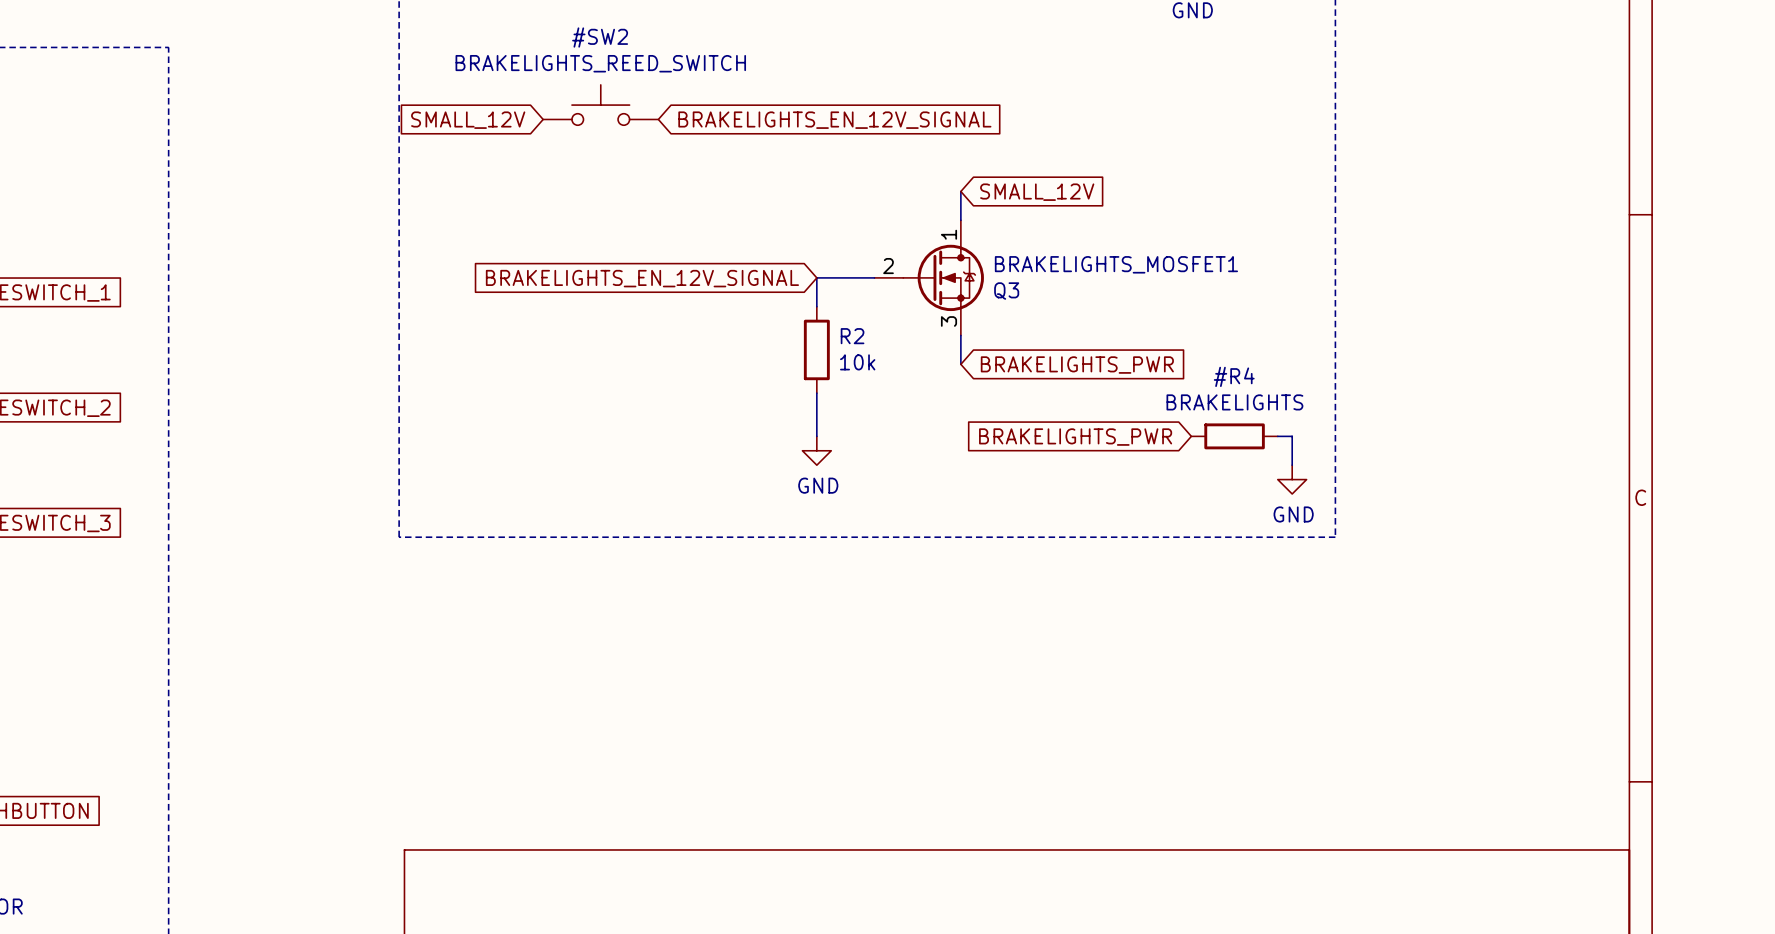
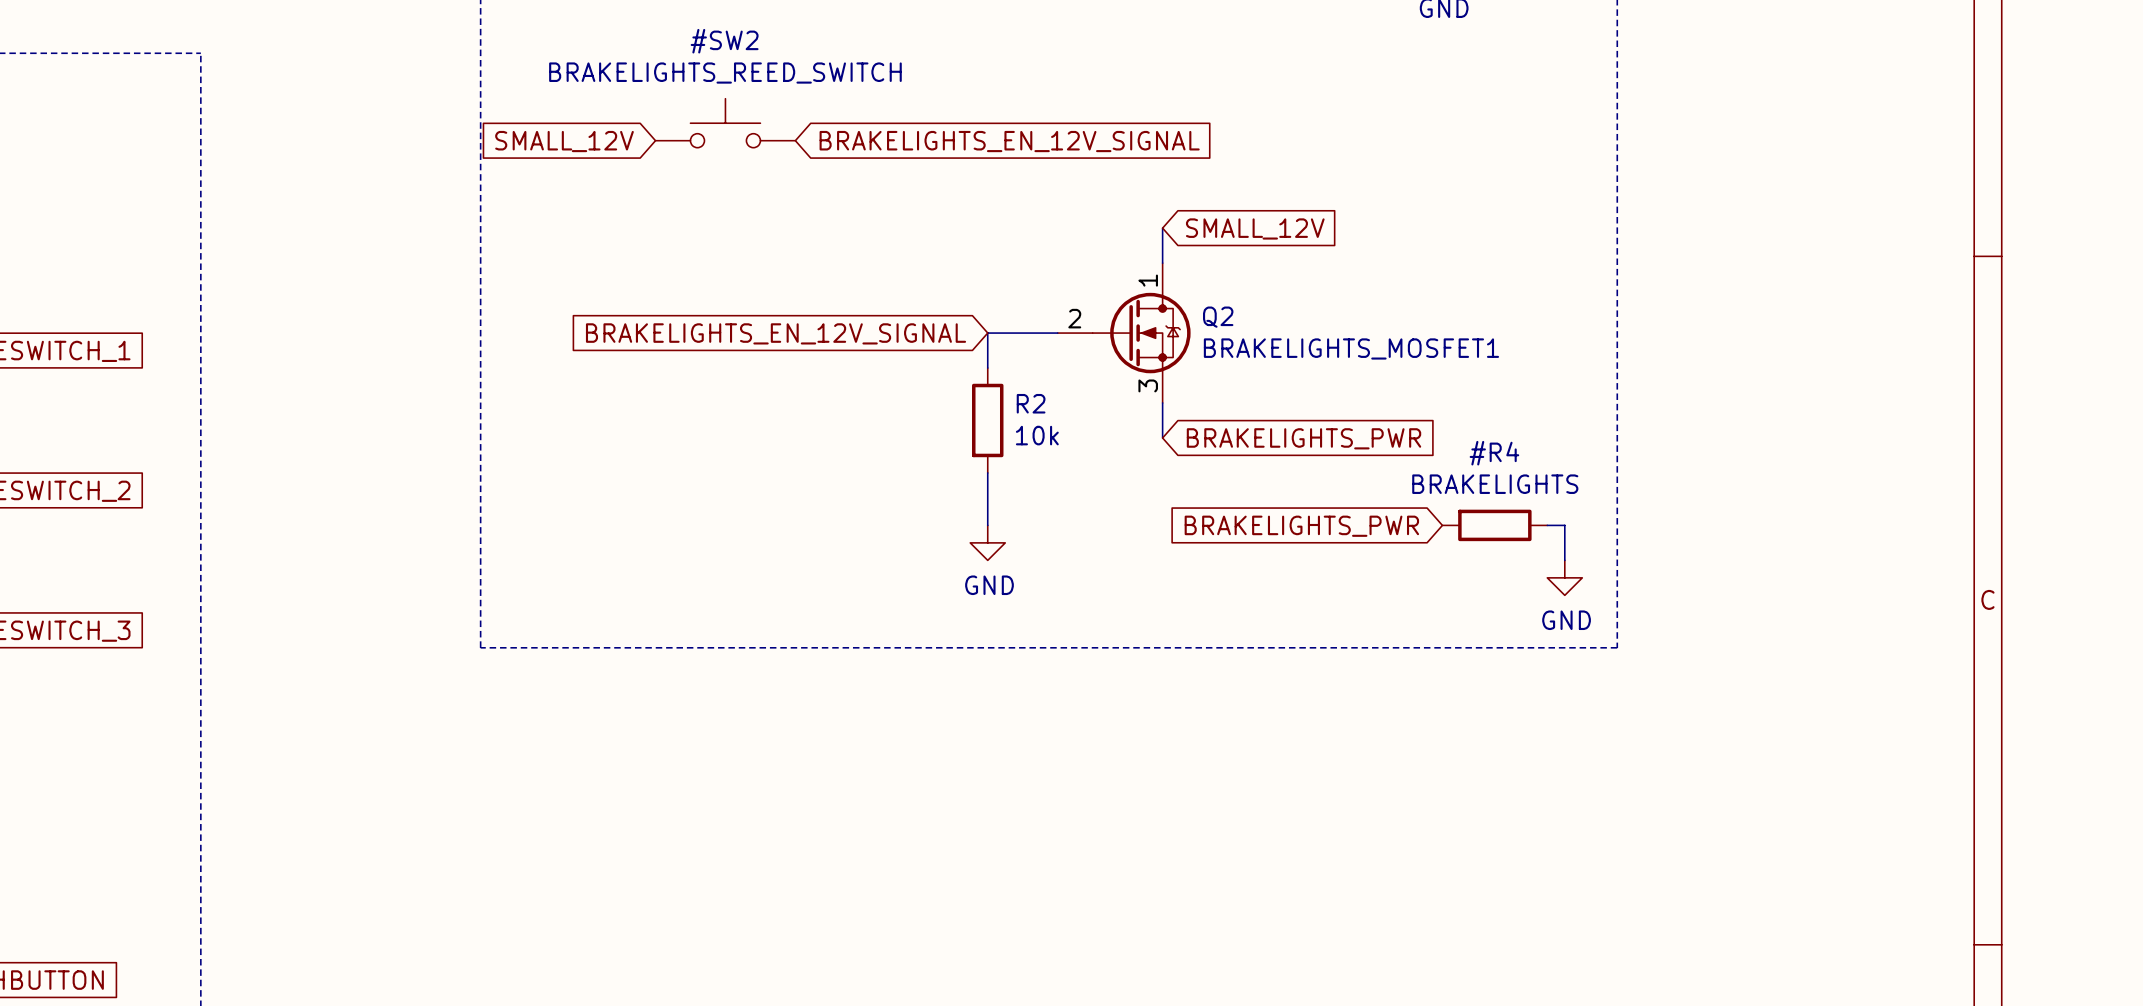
BRAKELIGHTS_MOSFET1 name: BRAKELIGHTS_MOSFET1 (1116, 264) -> Q2 (1218, 317)
BRAKELIGHTS_MOSFET1 value: Q3 (1006, 291) -> BRAKELIGHTS_MOSFET1 (1351, 348)

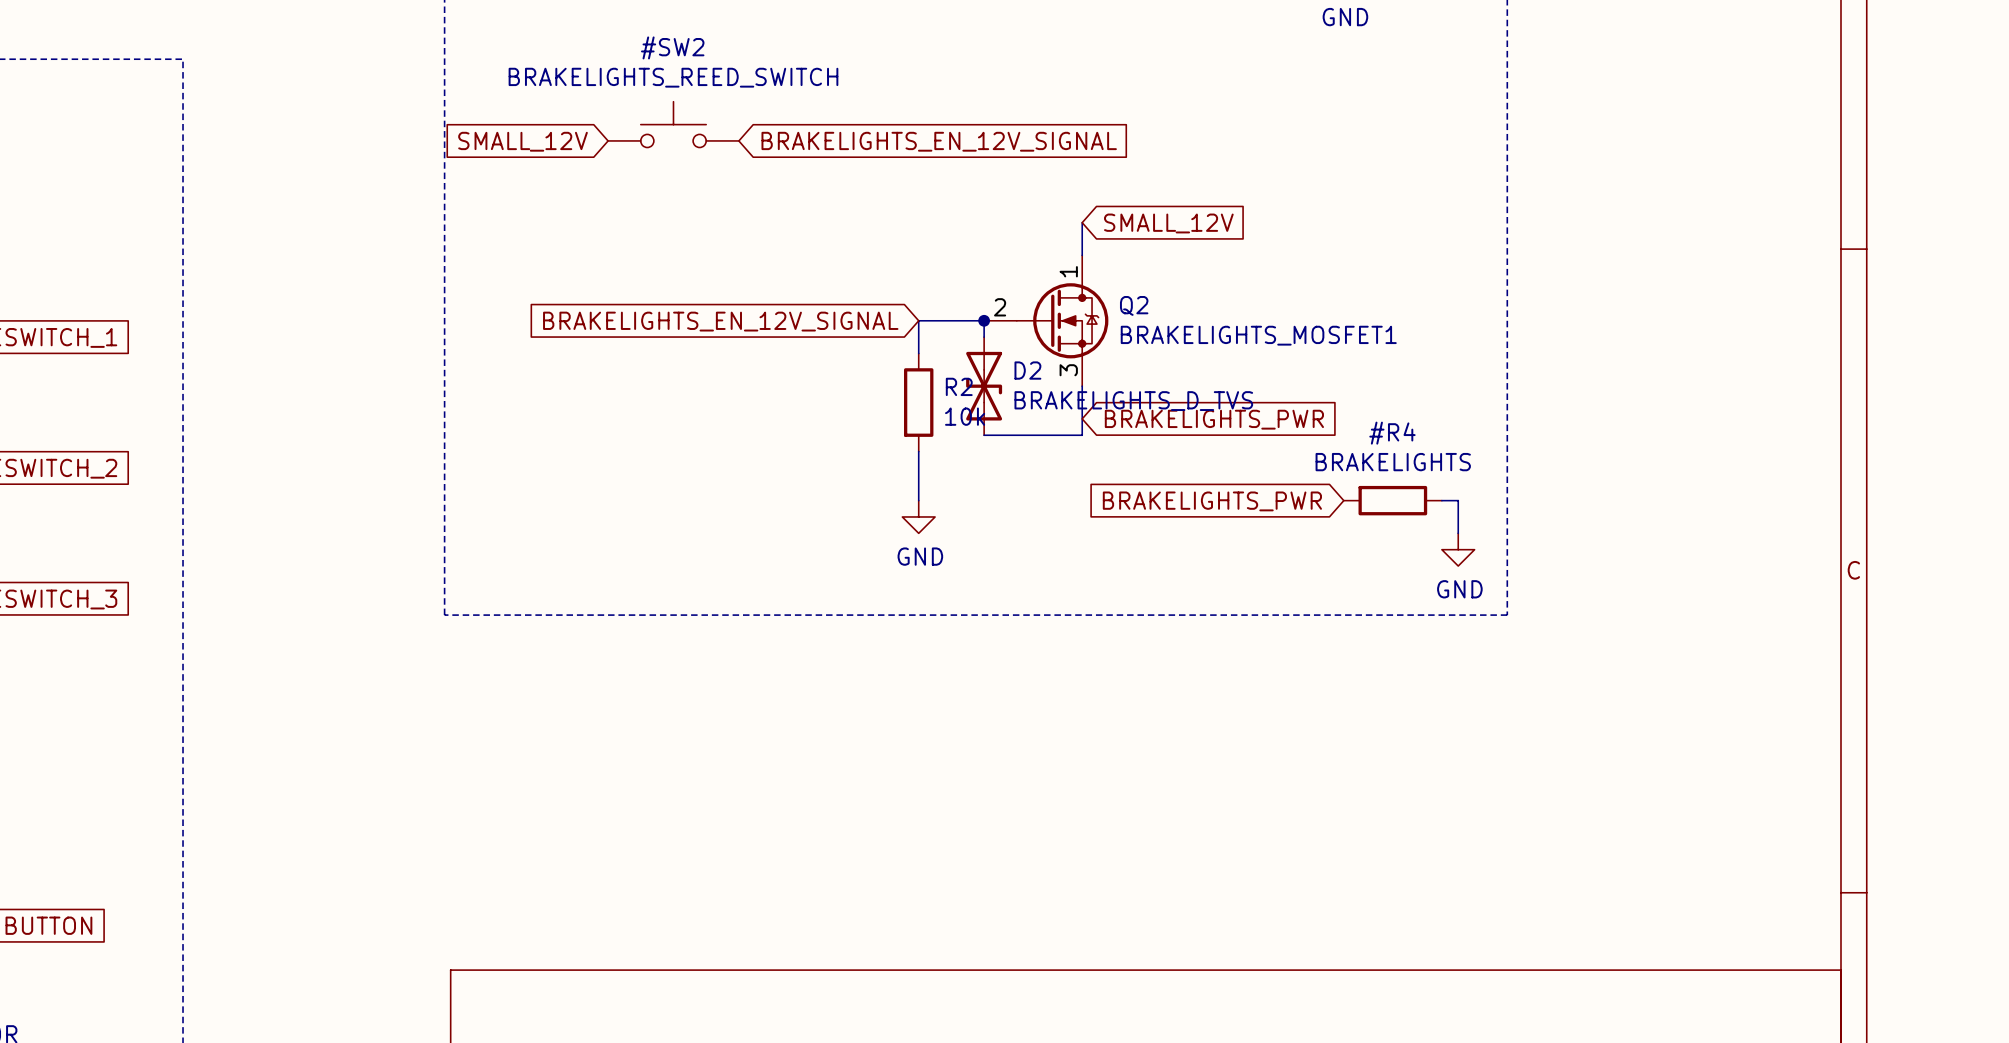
wire: none -> (984, 320) (984, 337)
junction: none -> (984, 320)
D2: none -> BRAKELIGHTS_D_TVS (984, 386)
wire: none -> (1082, 418) (1082, 435) (984, 435)

